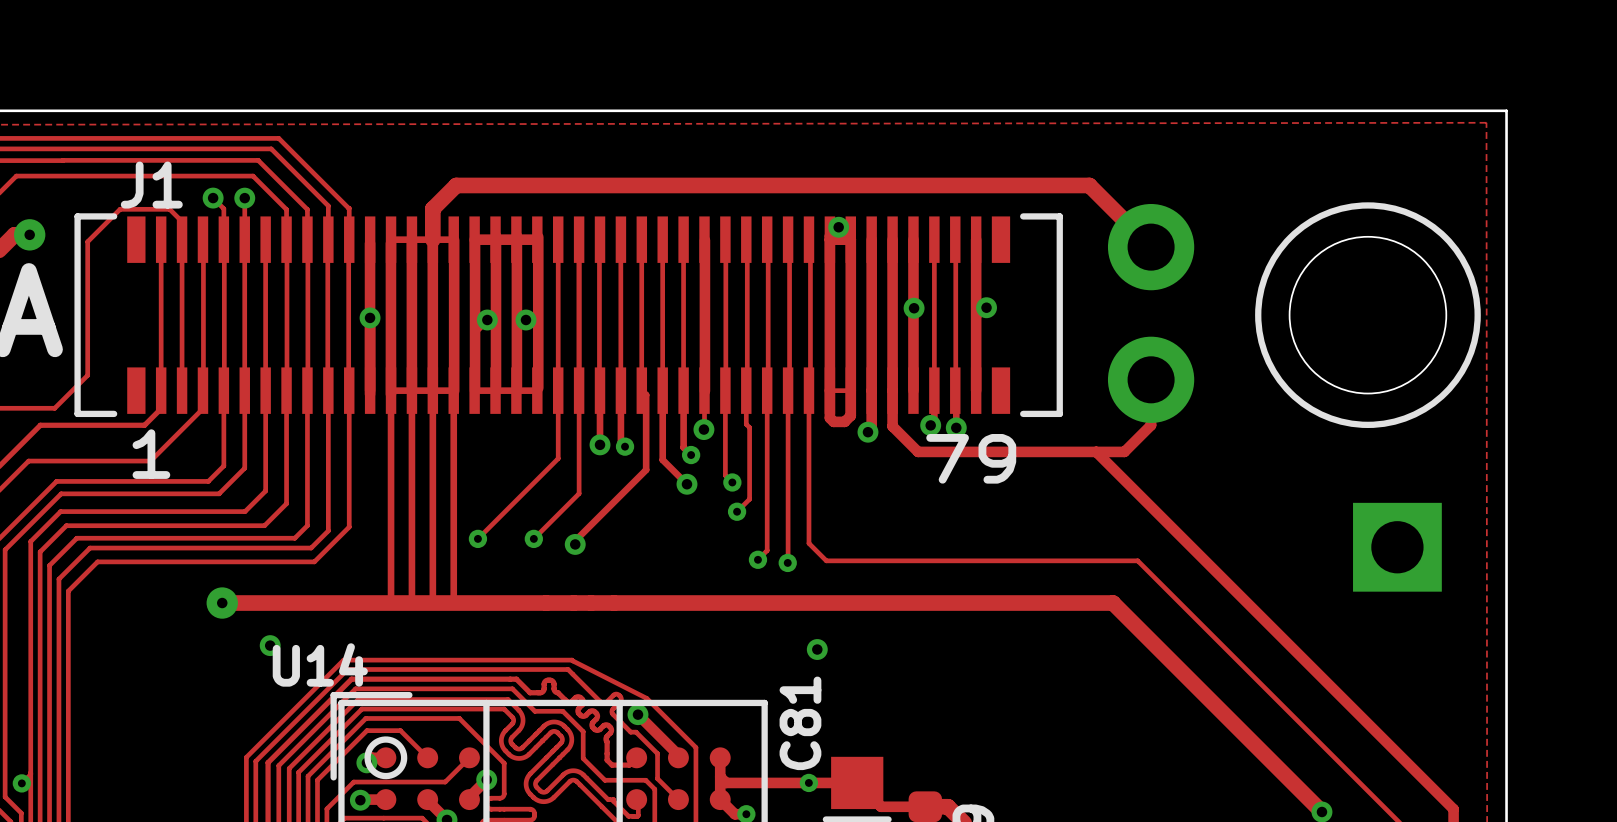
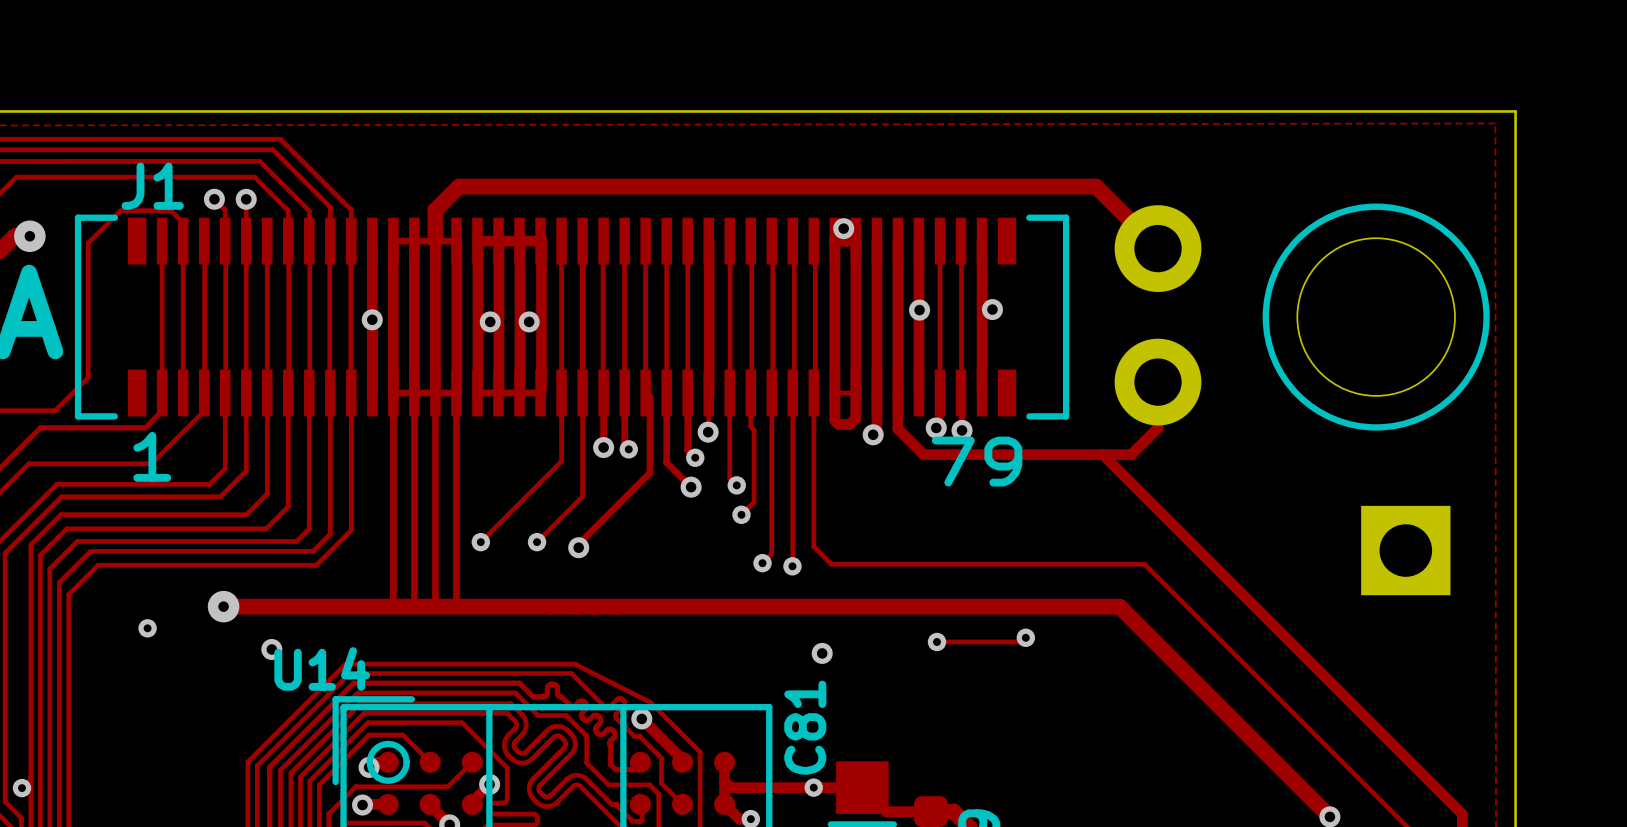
via: none -> (147, 628)
track: none -> (1025, 637) (1021, 641) (937, 641)
via: none -> (1025, 637)
via: none -> (937, 641)

